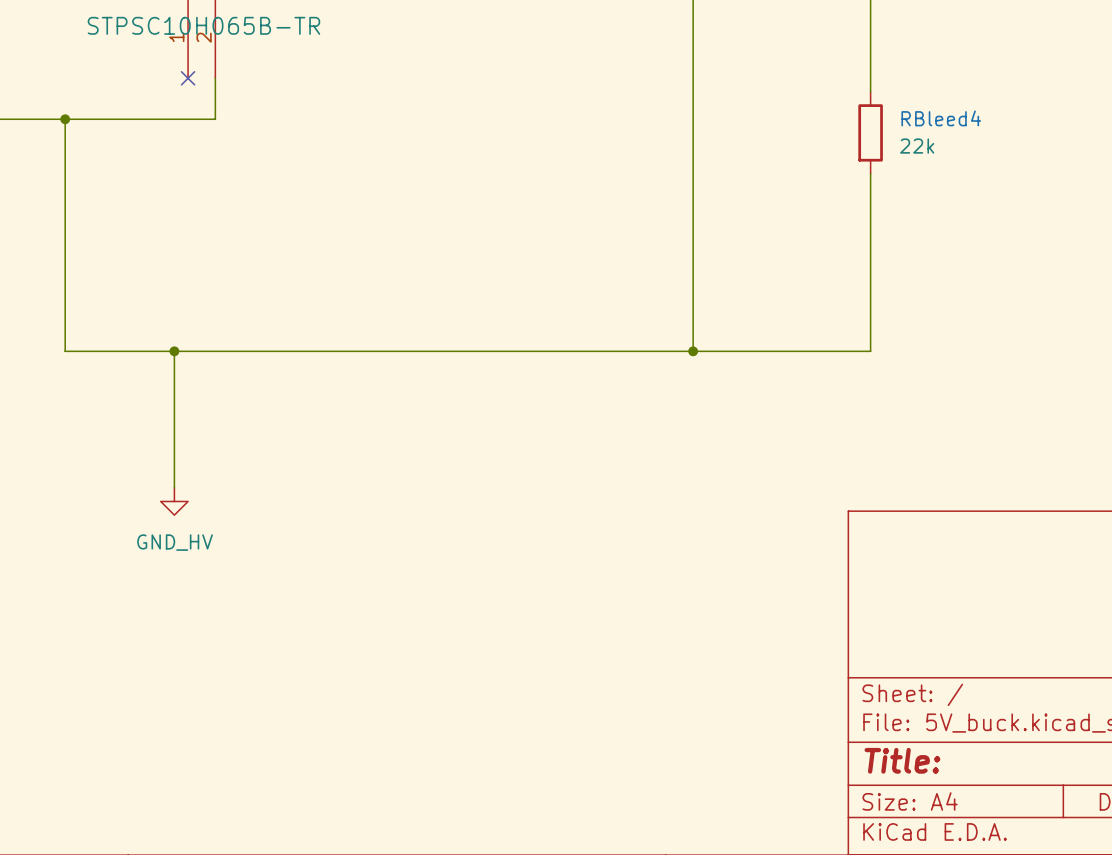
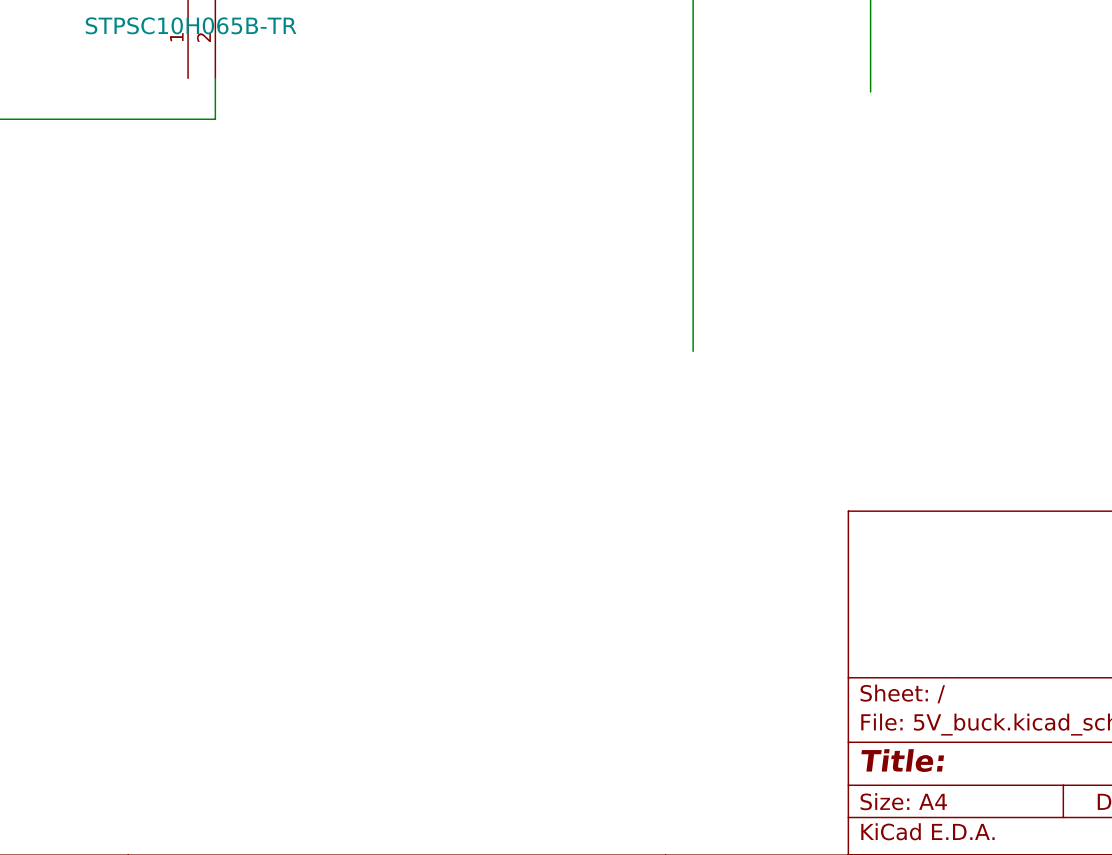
no-connect mark: (188, 78) -> none
wire: (65, 119) (65, 351) (870, 351) (870, 173) -> none
junction: (65, 119) -> none
RBleed4: 22k (870, 132) -> none
wire: (174, 351) (174, 487) -> none
junction: (174, 351) -> none
junction: (693, 351) -> none
power symbol: GND_HV (174, 501) -> none

